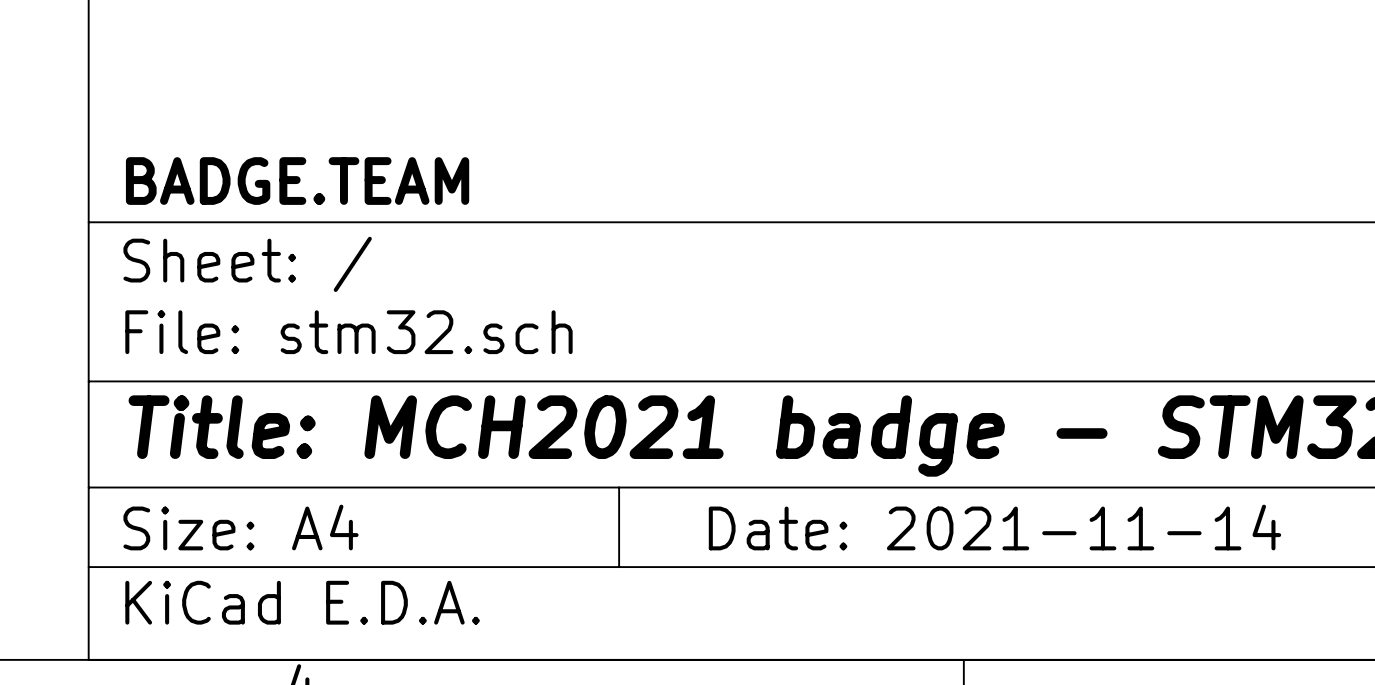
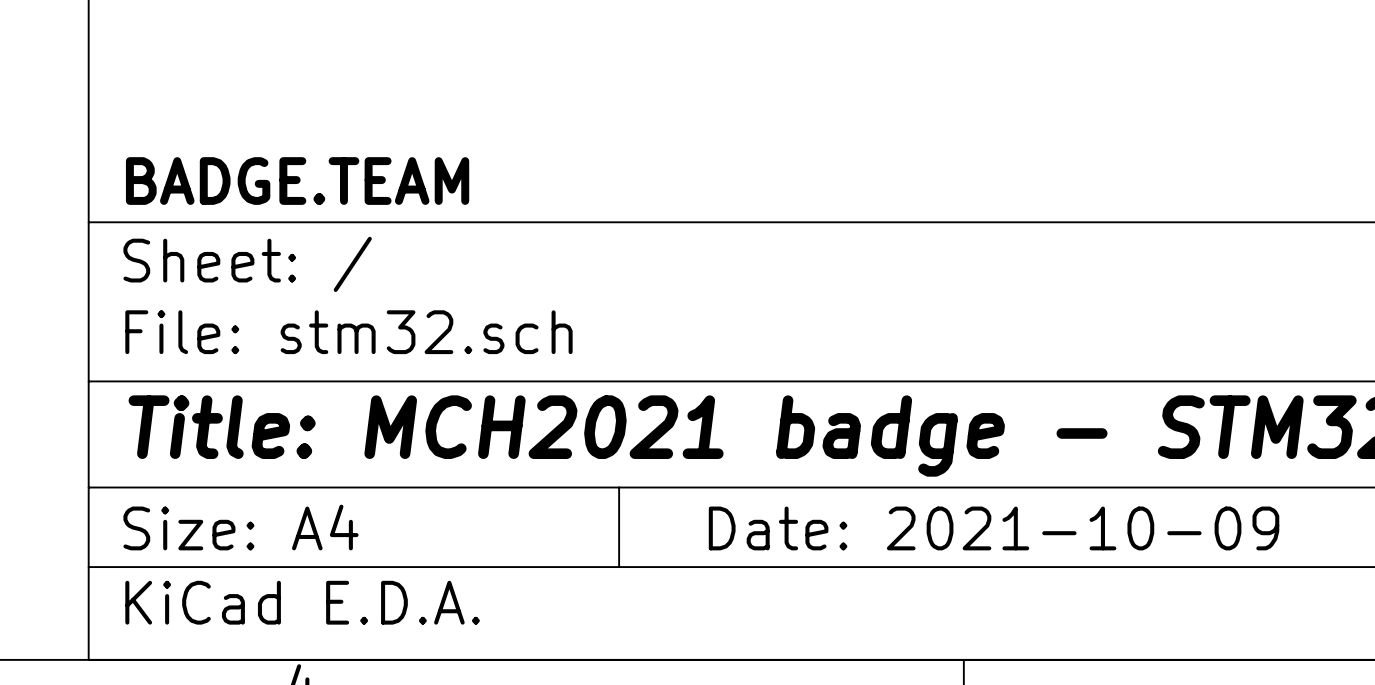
title block: Date: 2021-11-14 (994, 527) -> Date: 2021-10-09 (994, 528)

